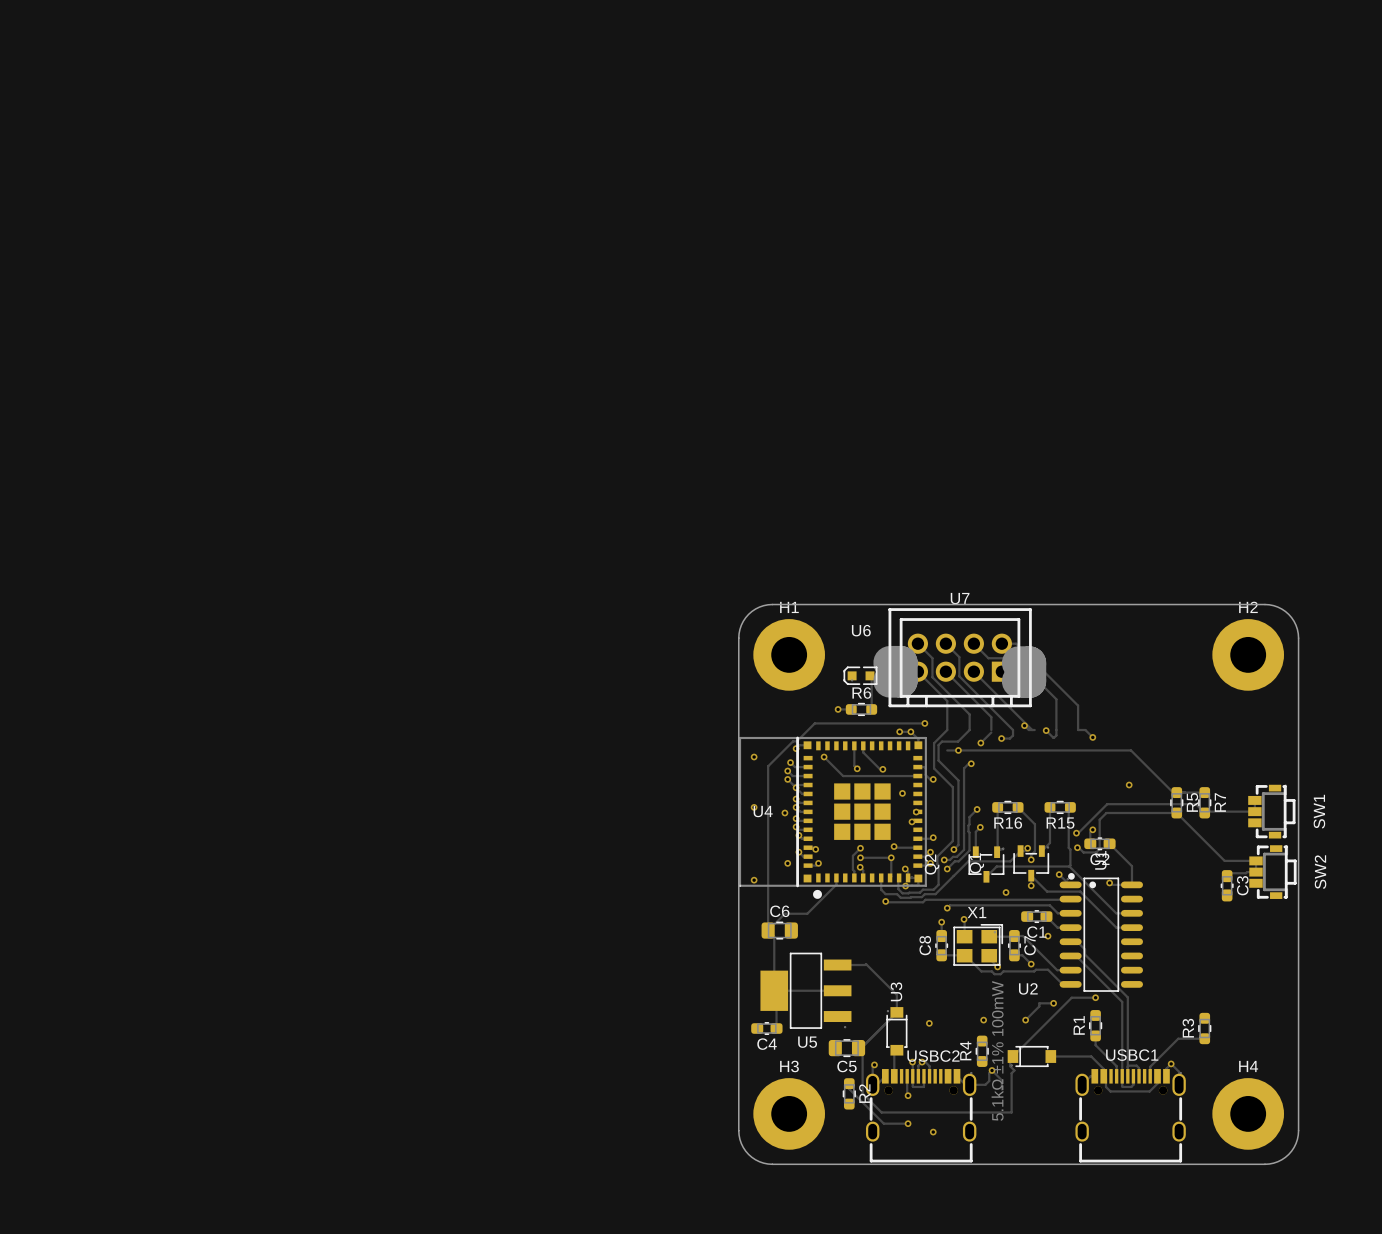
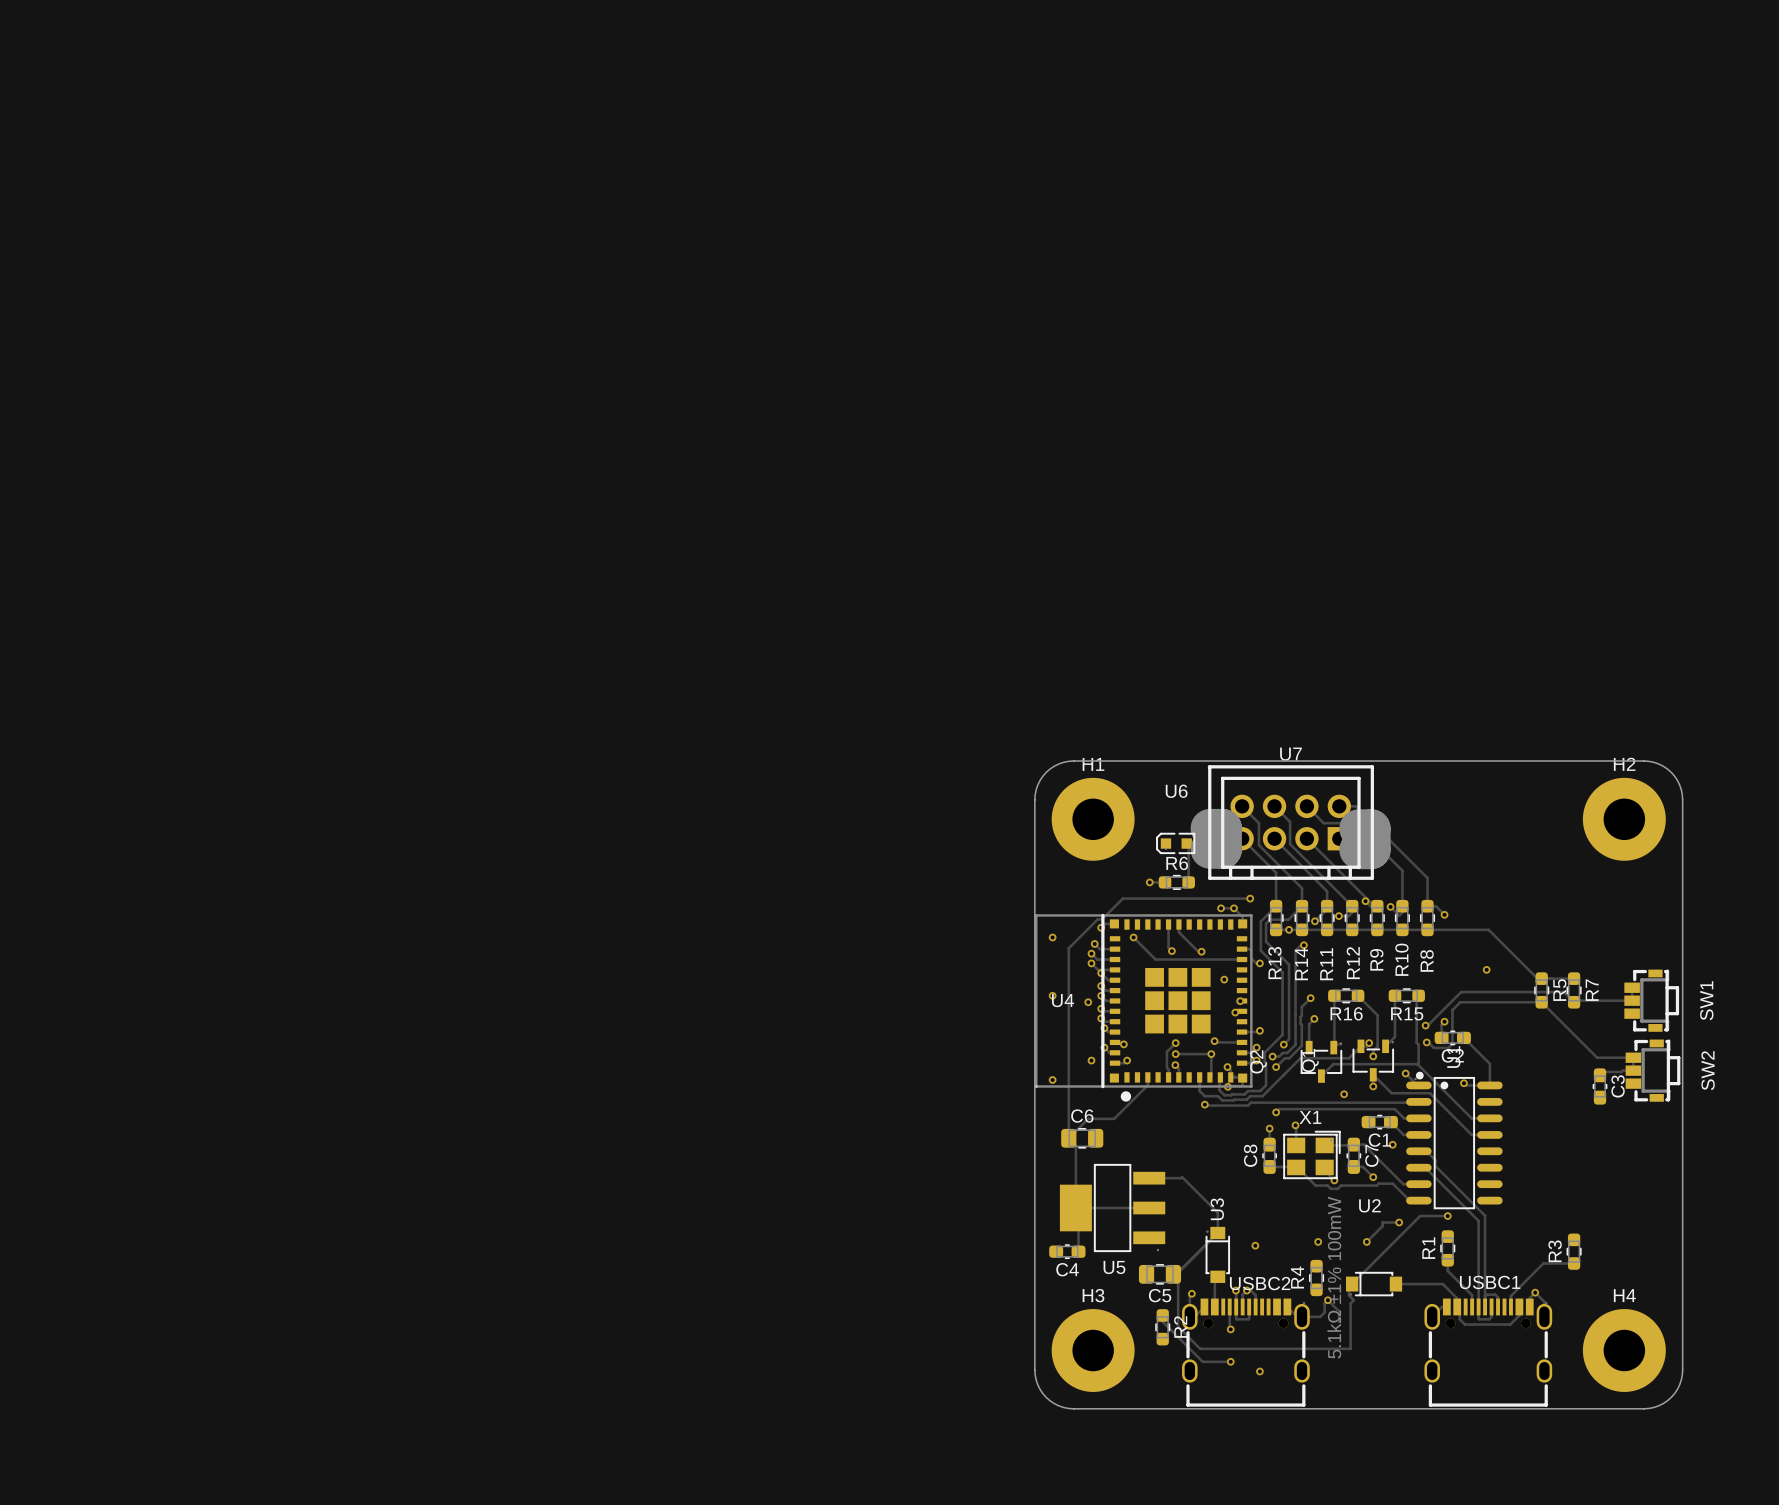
R13: none -> (1276, 918)
R14: none -> (1302, 918)
R11: none -> (1327, 918)
R12: none -> (1352, 918)
R9: none -> (1377, 918)
R10: none -> (1402, 918)
R8: none -> (1427, 918)

